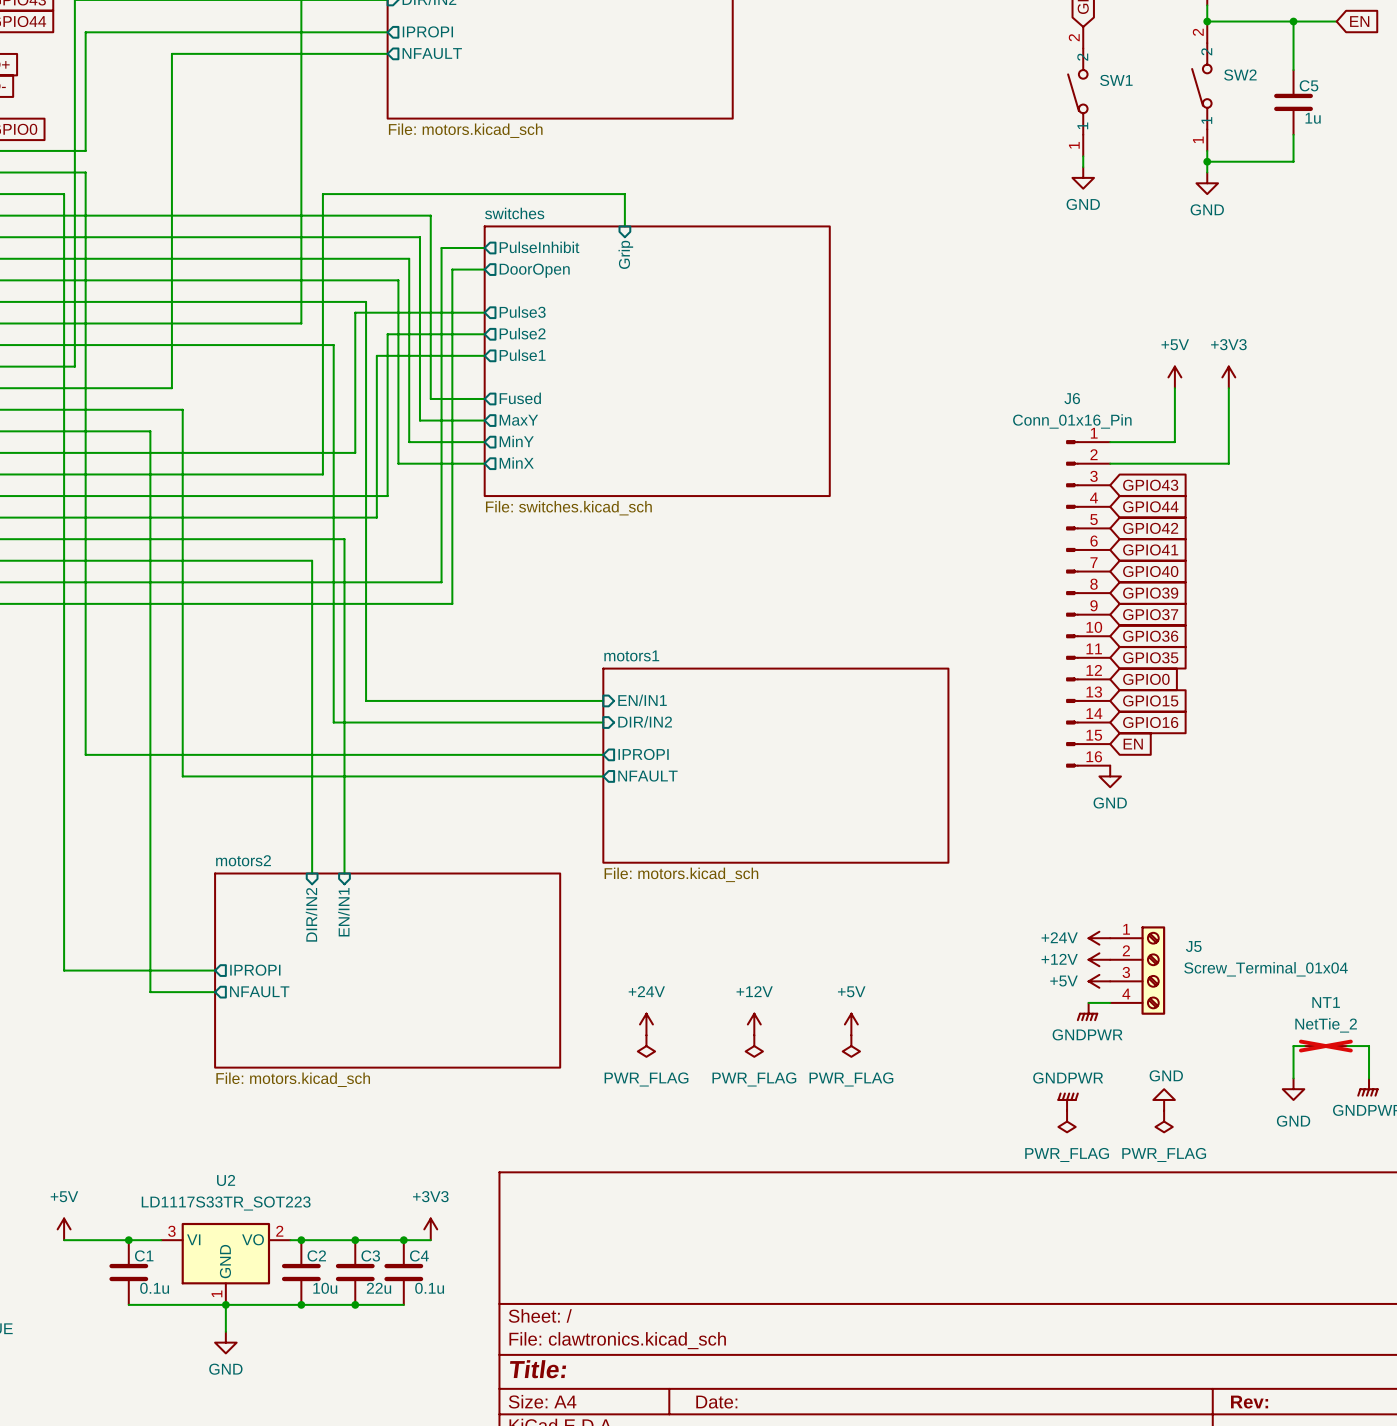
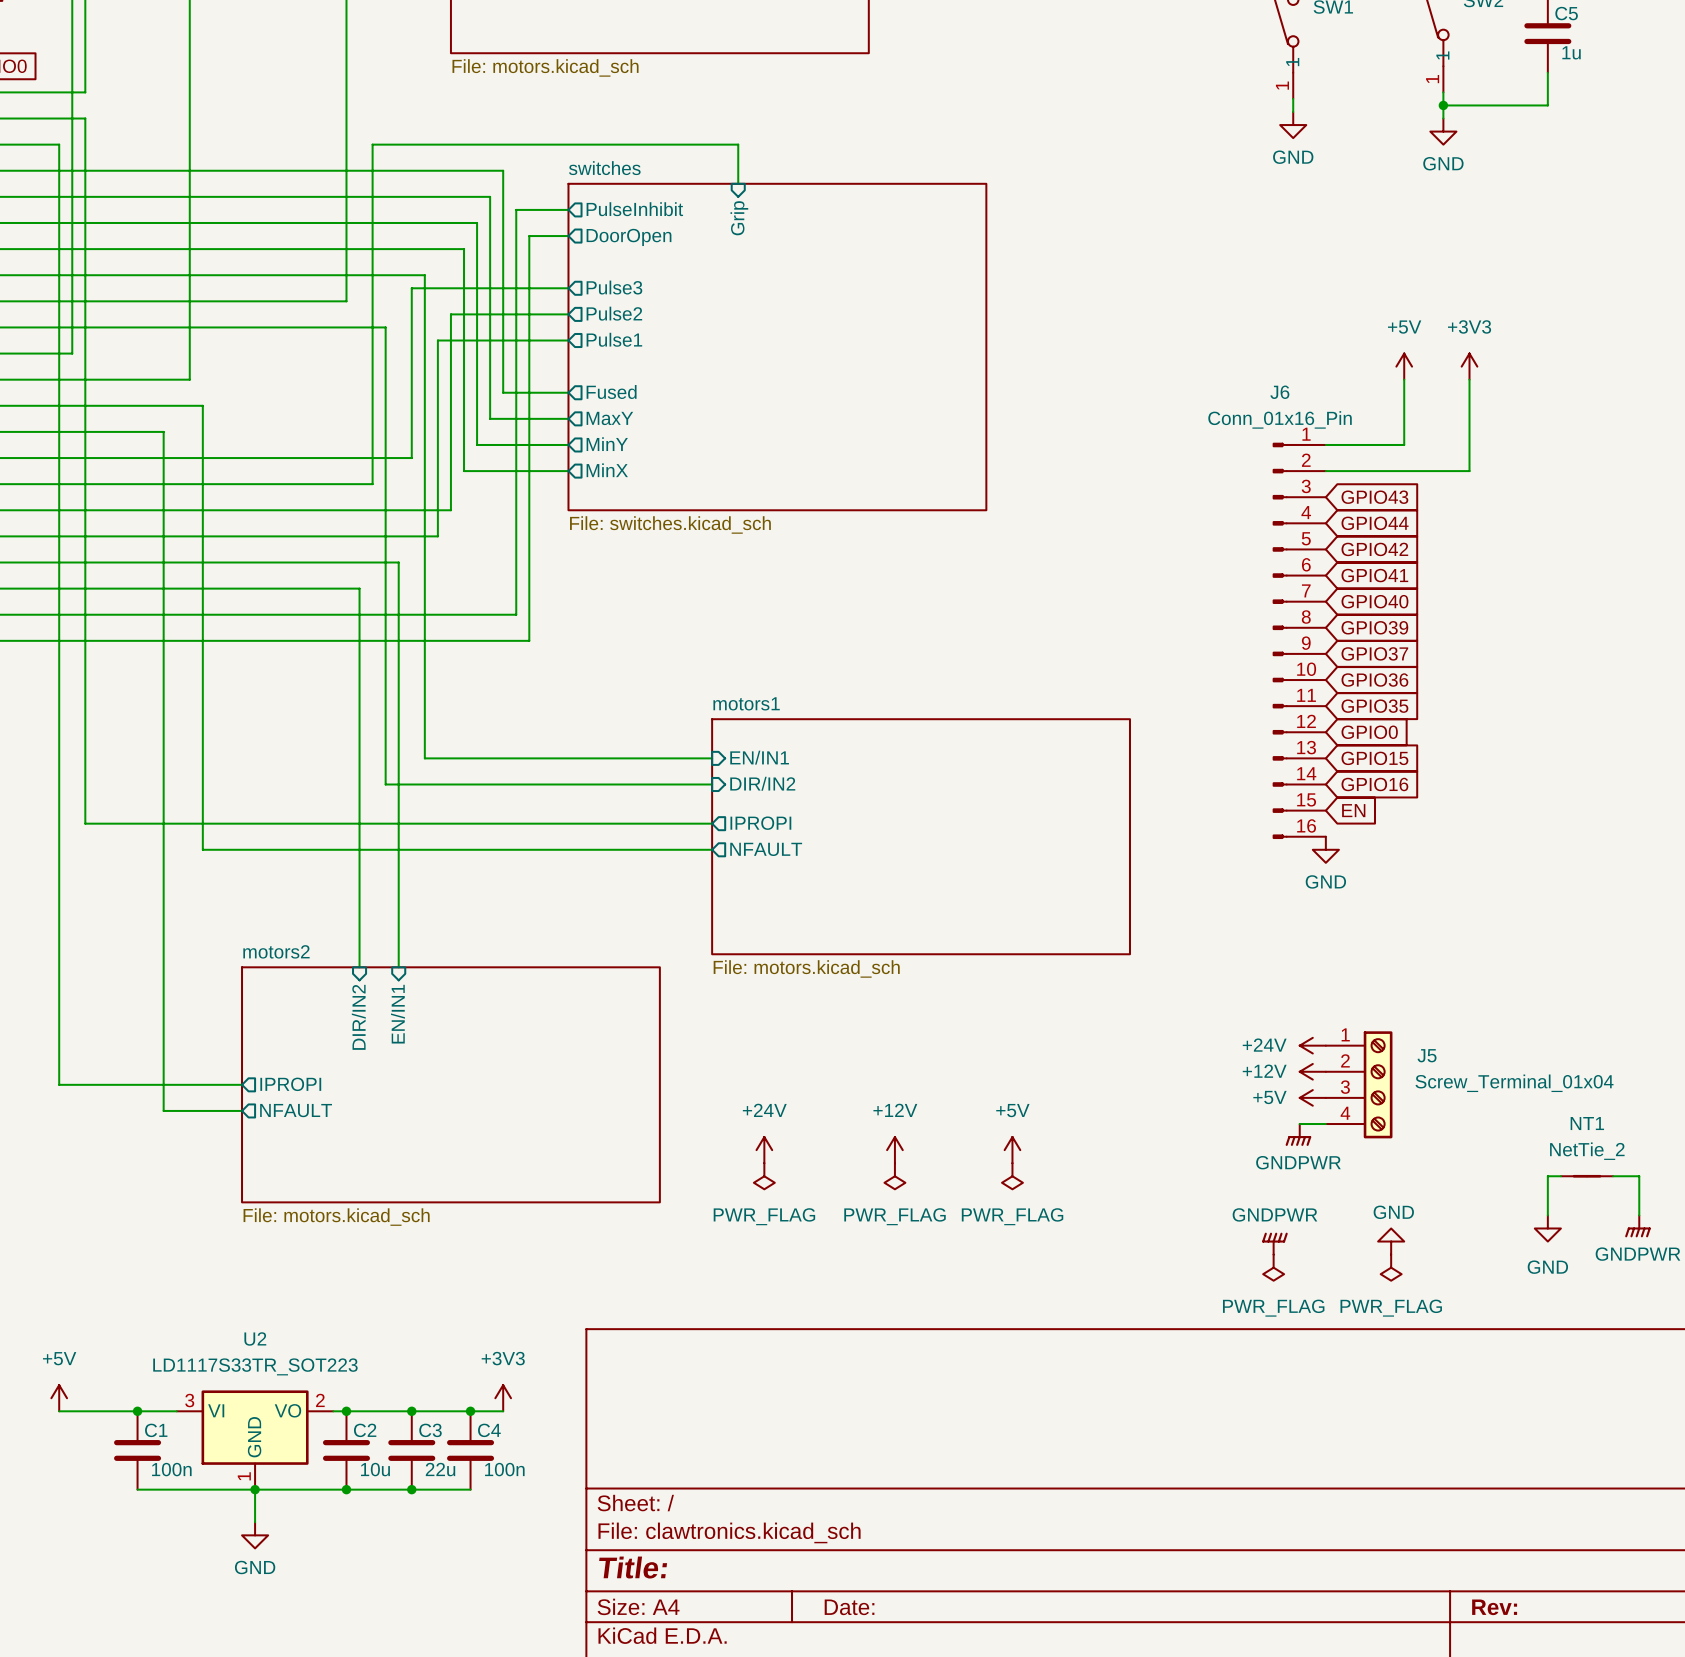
NT1 do-not-place cross: (1325, 1046) -> none
C1 value: 0.1u (154, 1288) -> 100n (171, 1469)
C4 value: 0.1u (429, 1288) -> 100n (504, 1469)

